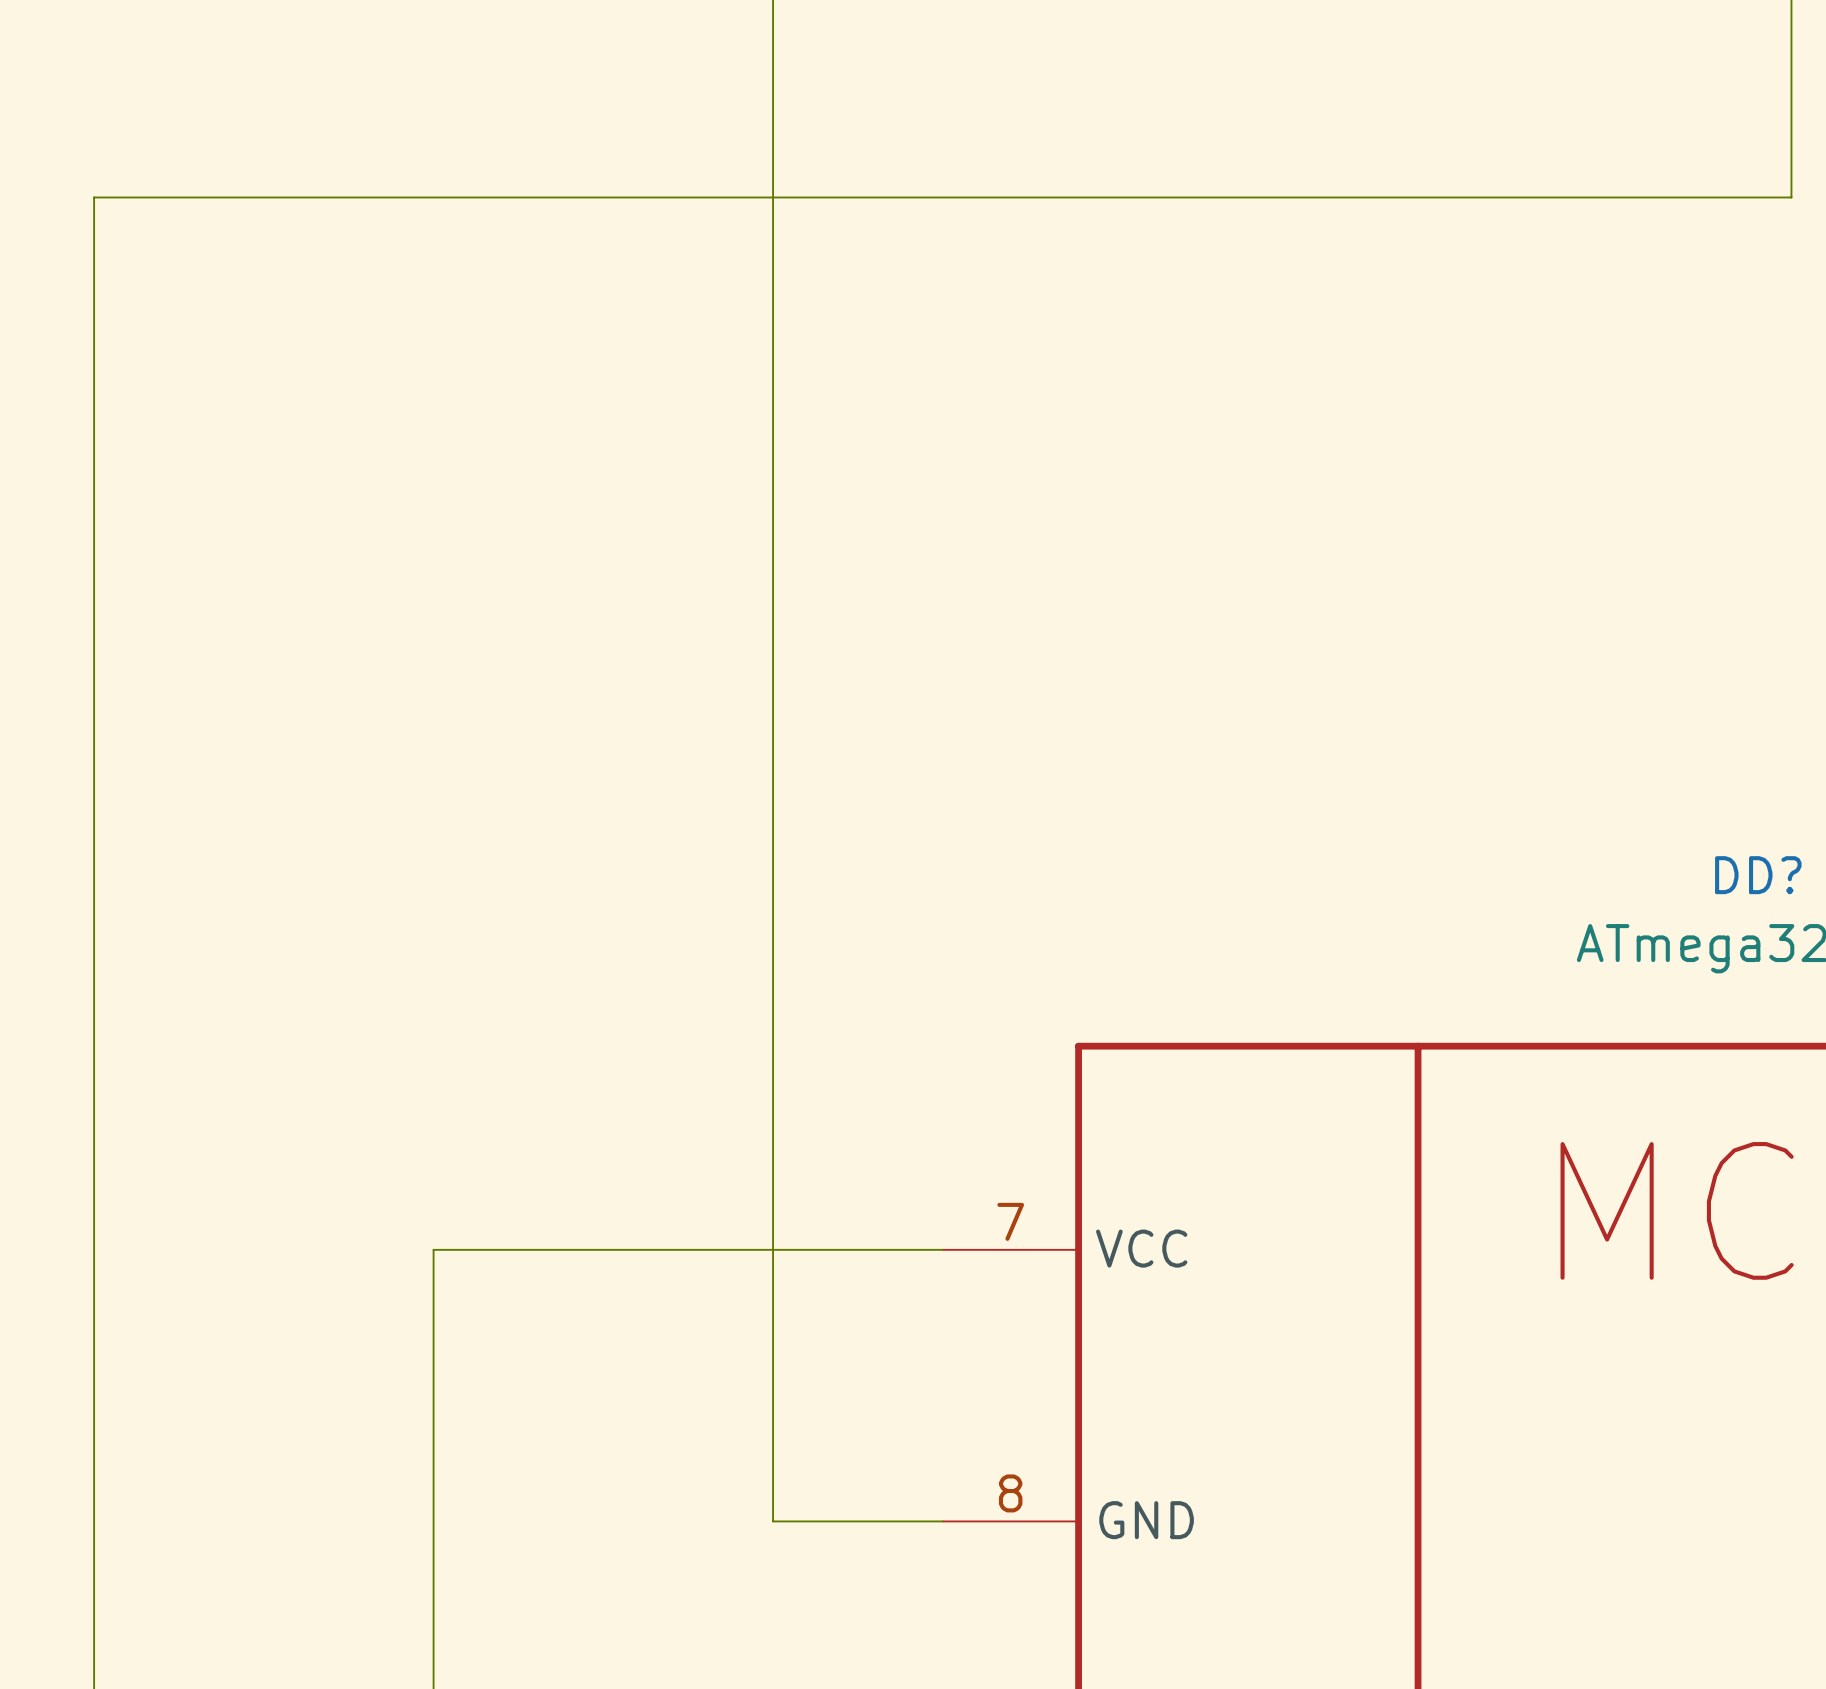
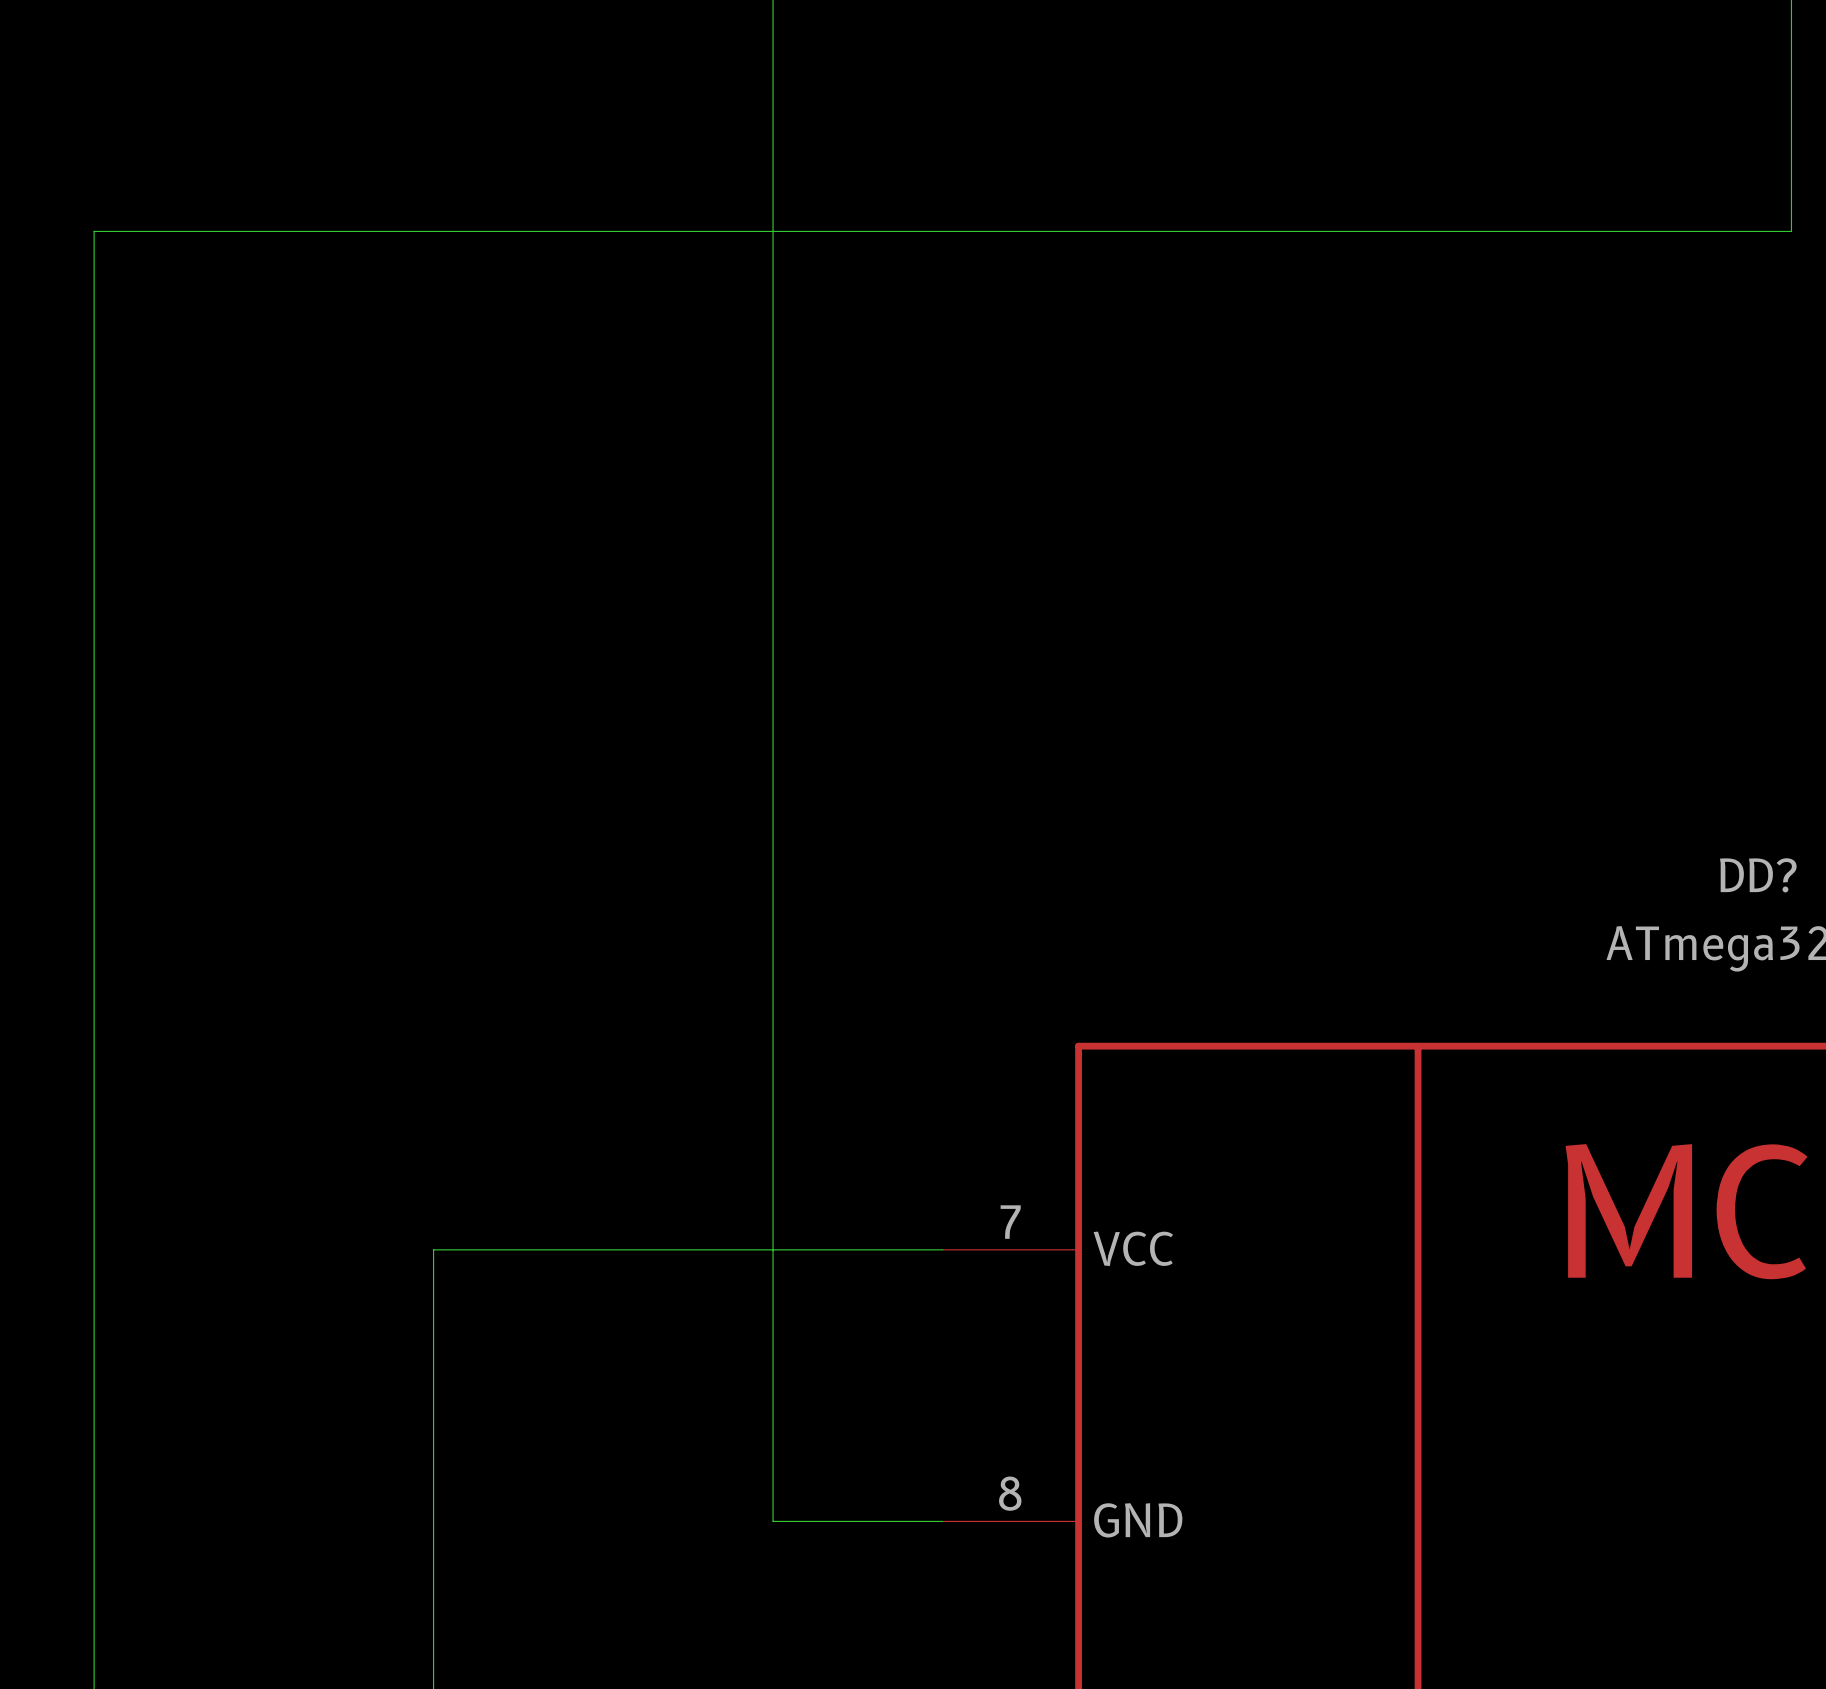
wire: (1791, 197) (94, 197) (94, 231) -> (1791, 197) (1791, 231) (94, 231)

